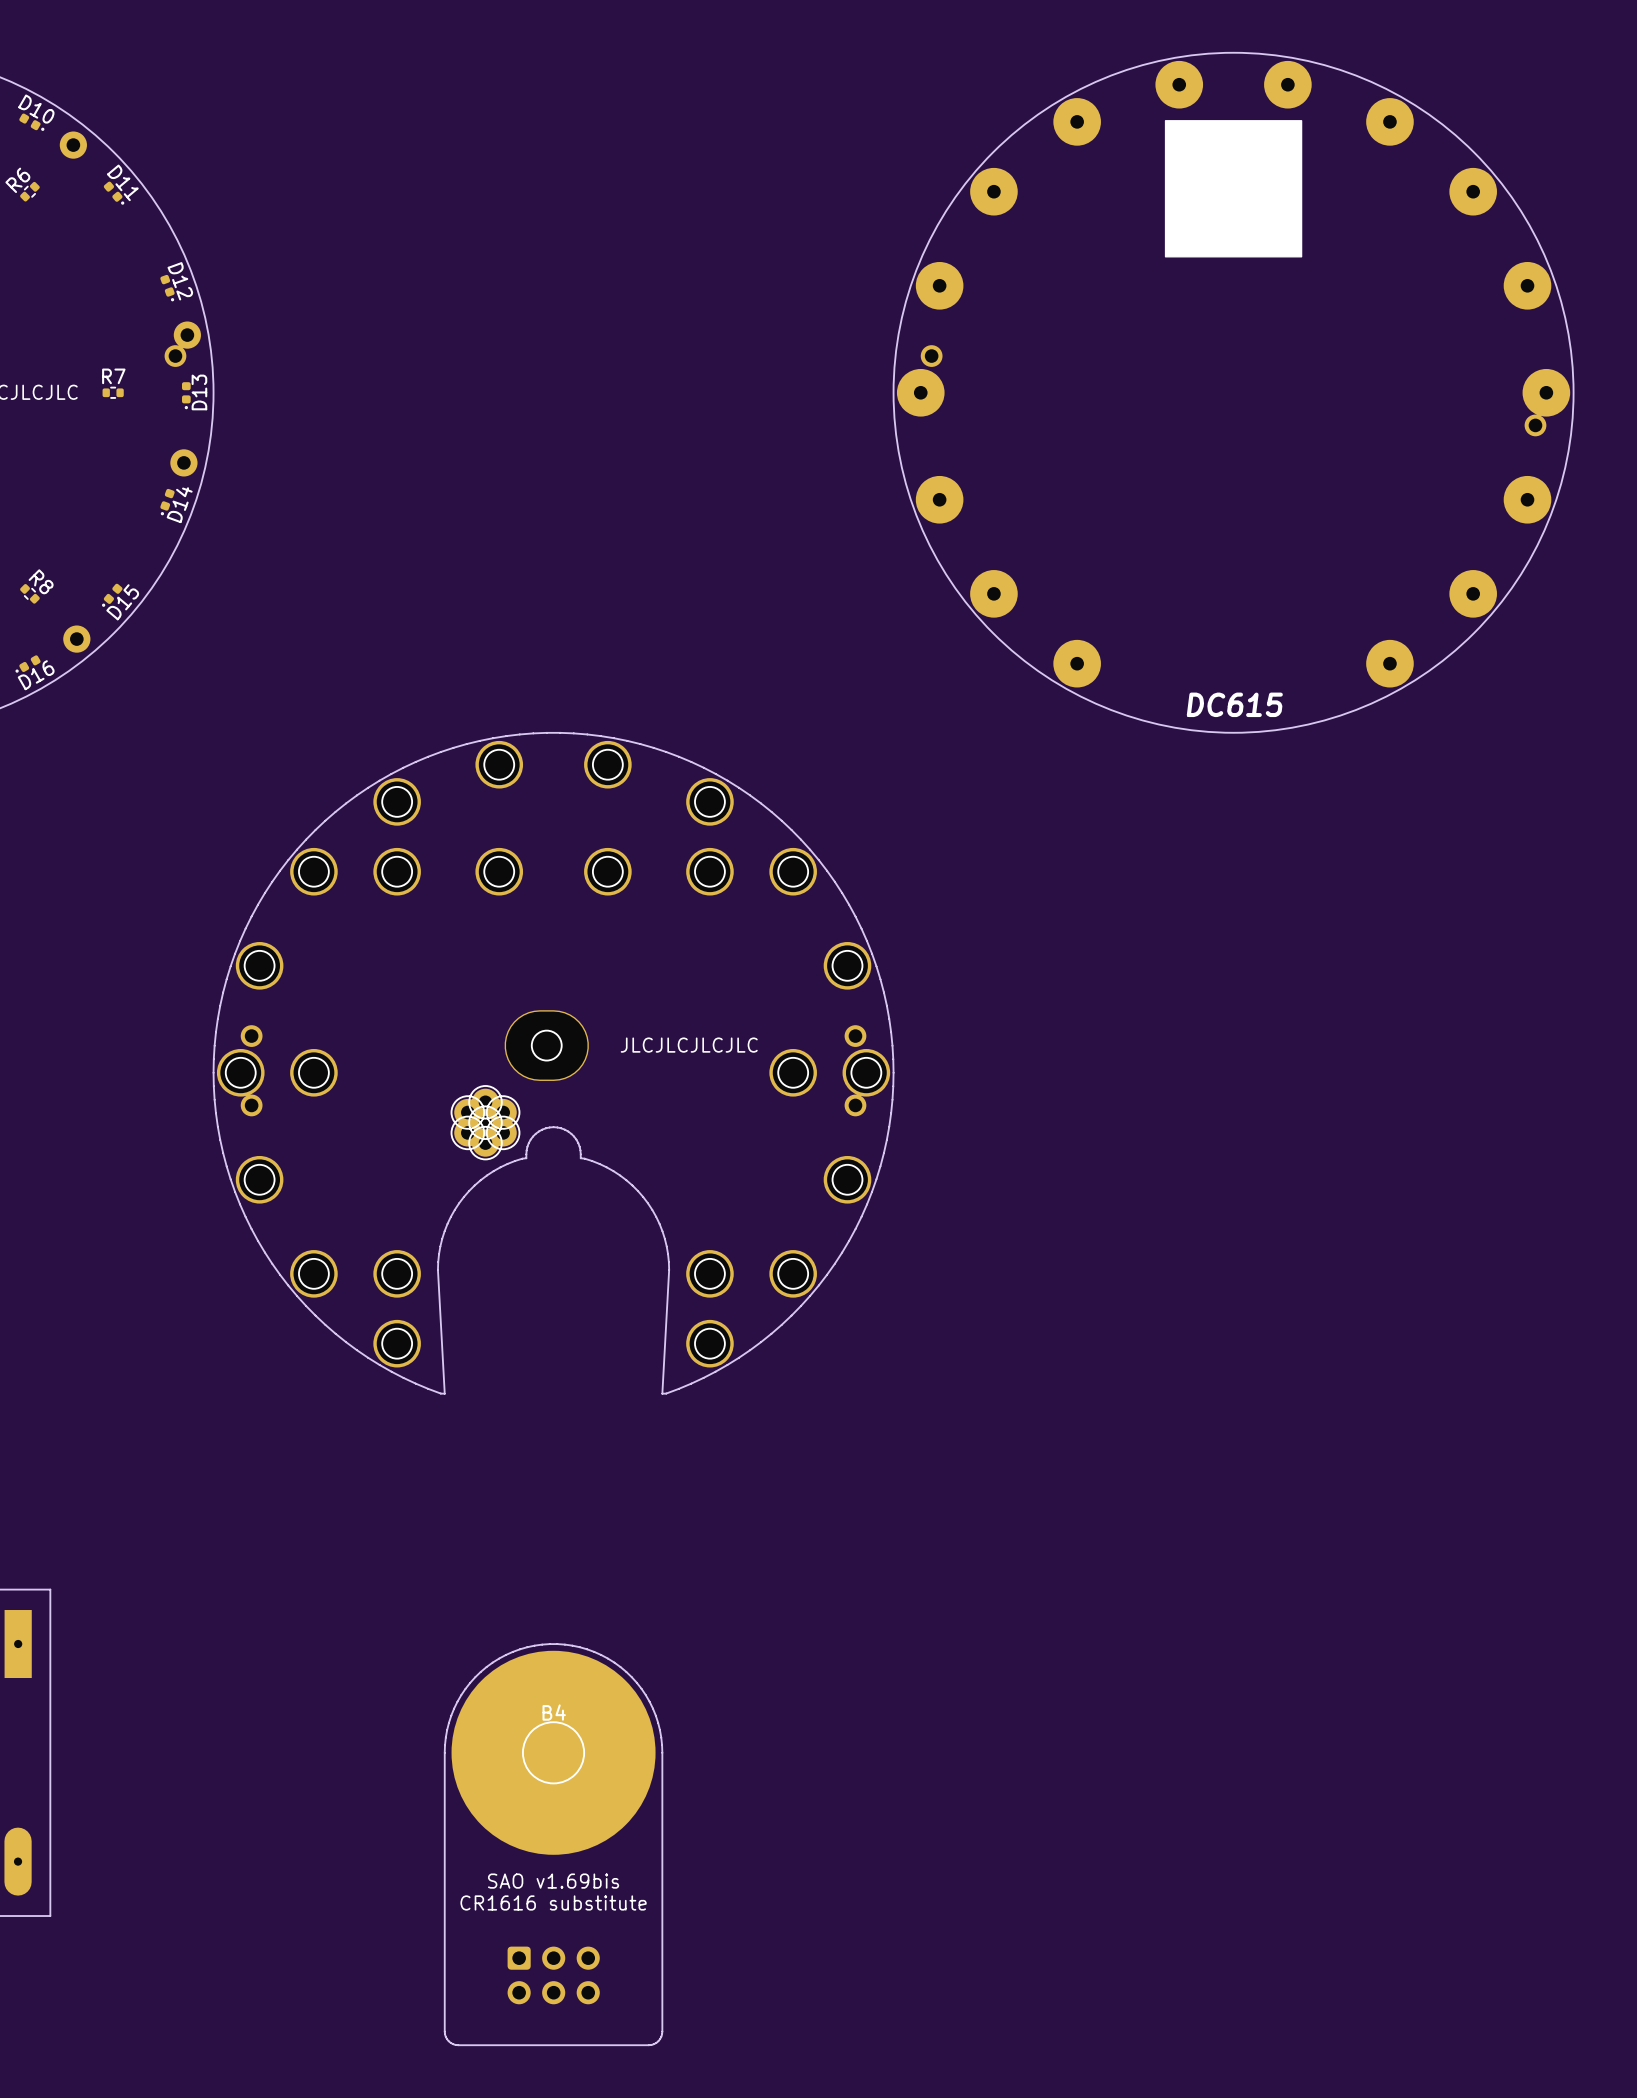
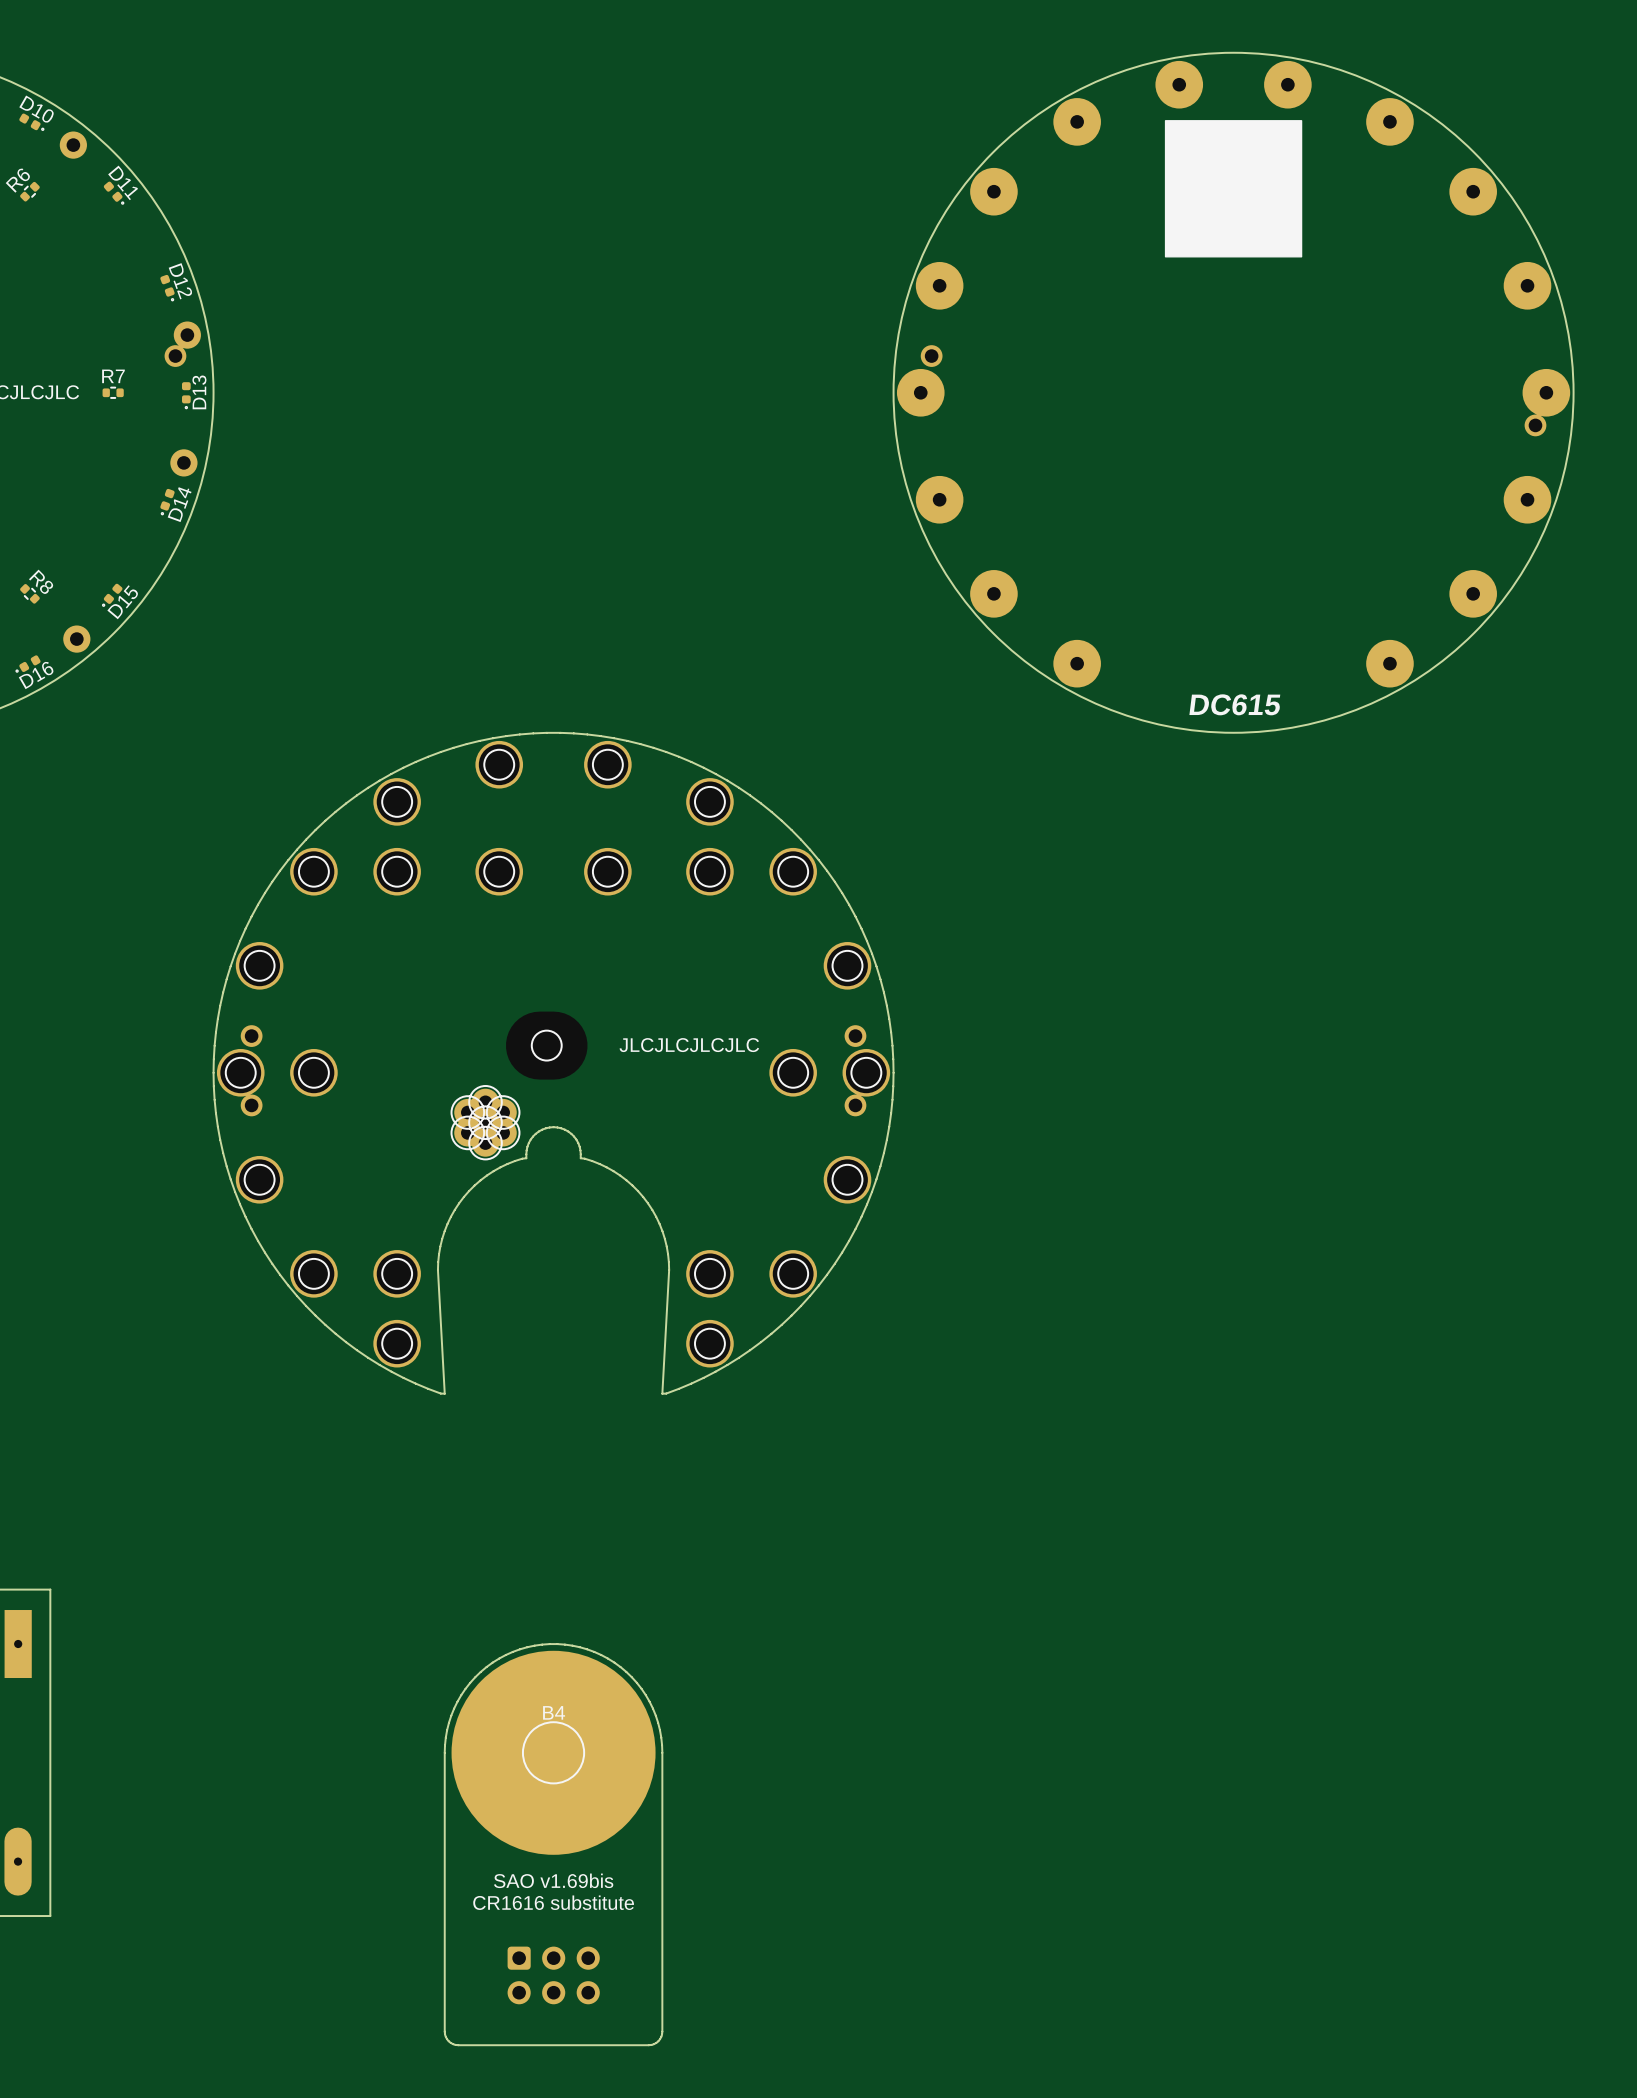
part footprint: [504, 1010, 589, 1081] -> [505, 1011, 588, 1080]

